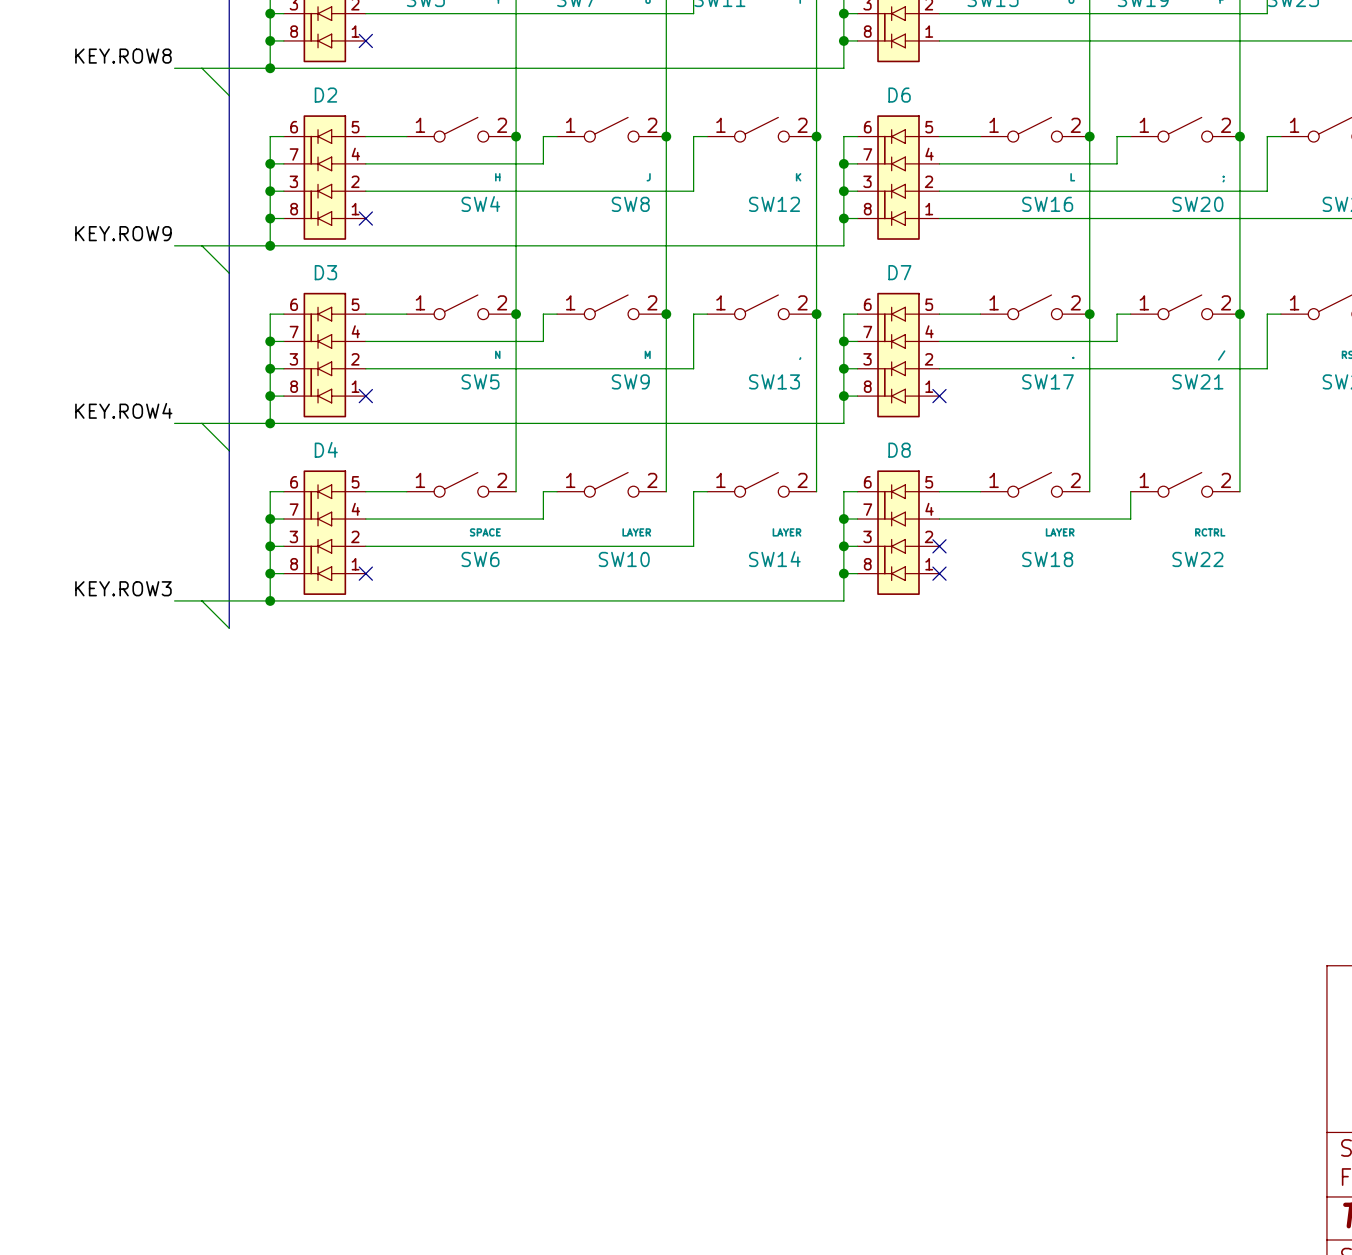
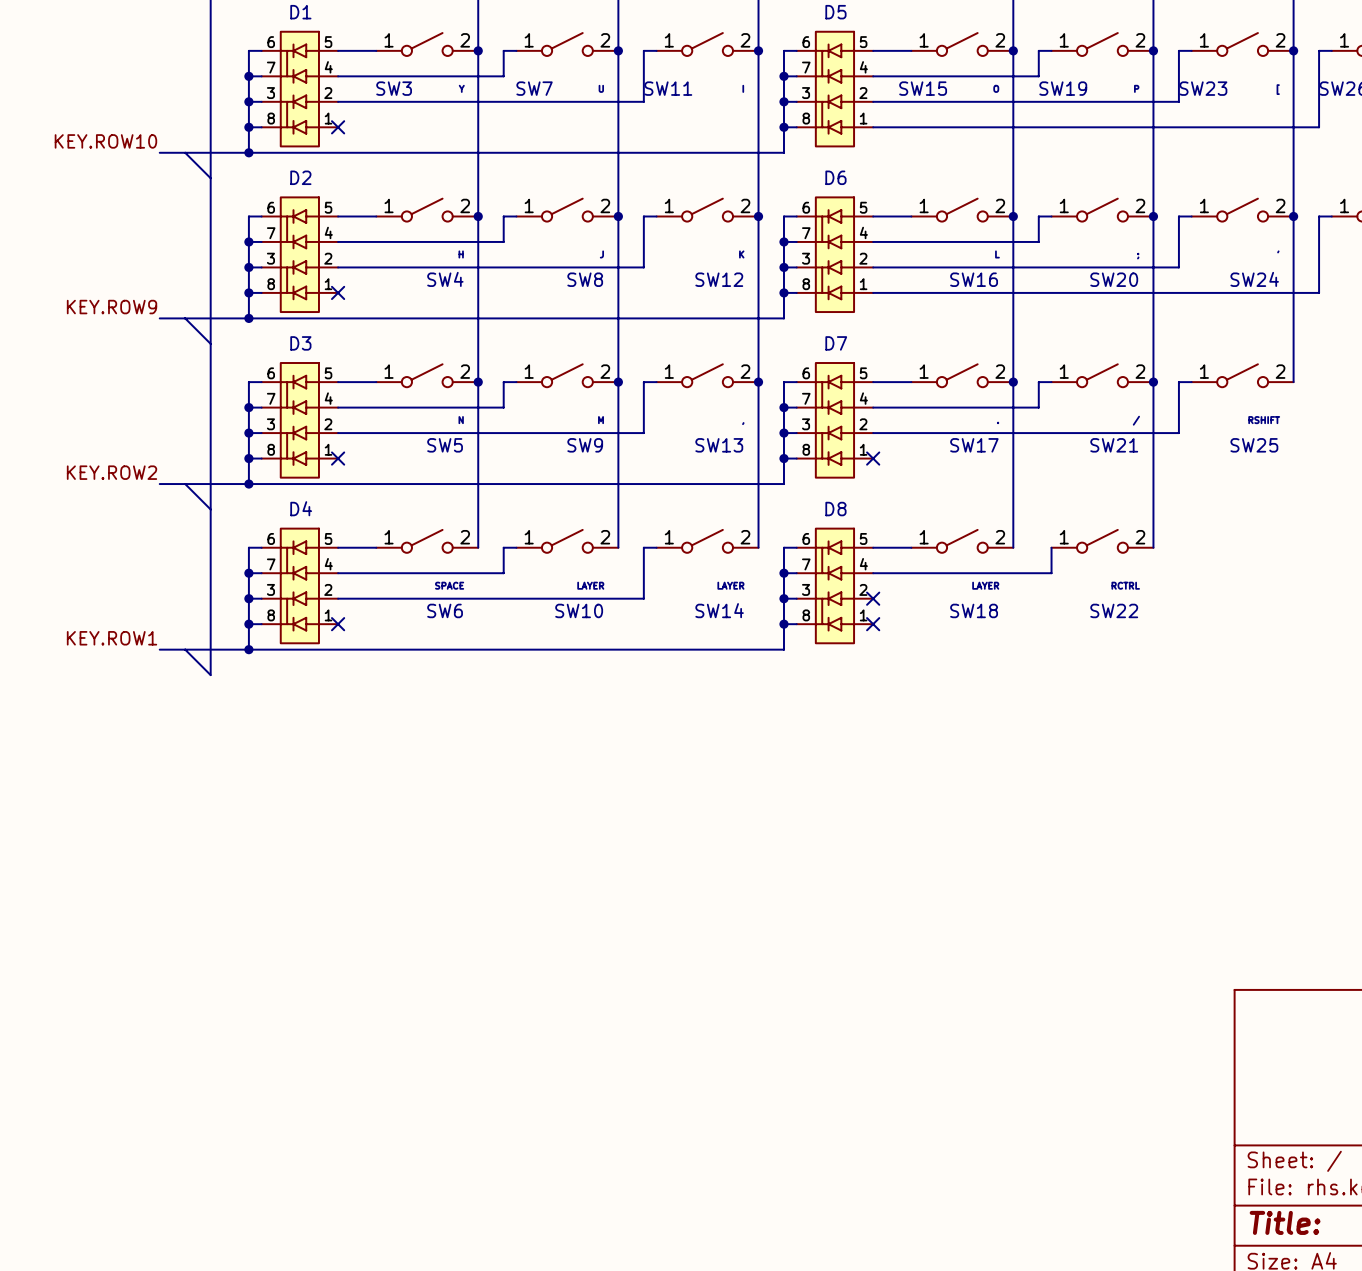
label: KEY.ROW8 (123, 56) -> KEY.ROW10 (105, 141)
label: KEY.ROW4 (123, 410) -> KEY.ROW2 (112, 472)
label: KEY.ROW3 (123, 588) -> KEY.ROW1 (112, 638)

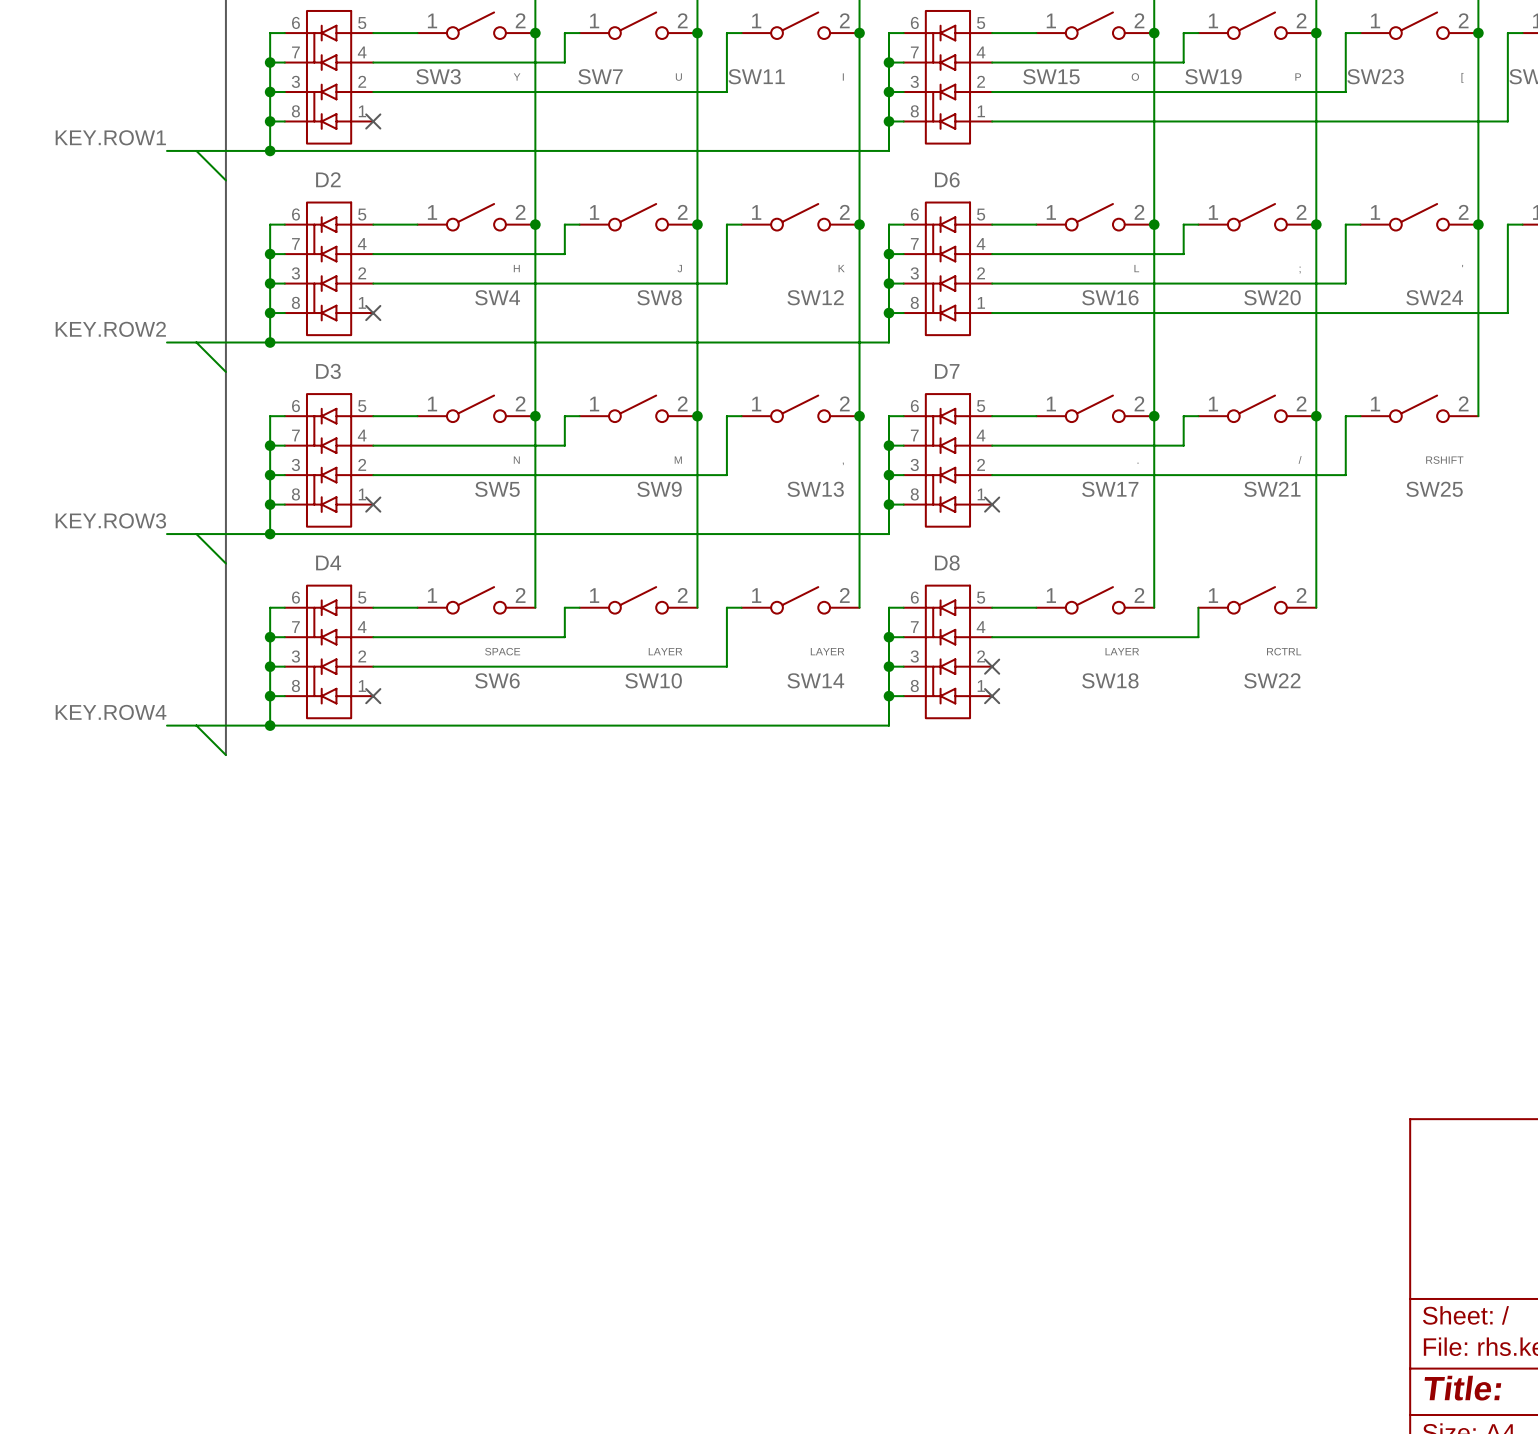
label: KEY.ROW10 (105, 141) -> KEY.ROW1 (110, 137)
label: KEY.ROW9 (112, 307) -> KEY.ROW2 (110, 329)
label: KEY.ROW2 (112, 472) -> KEY.ROW3 (110, 520)
label: KEY.ROW1 (112, 638) -> KEY.ROW4 (111, 712)

